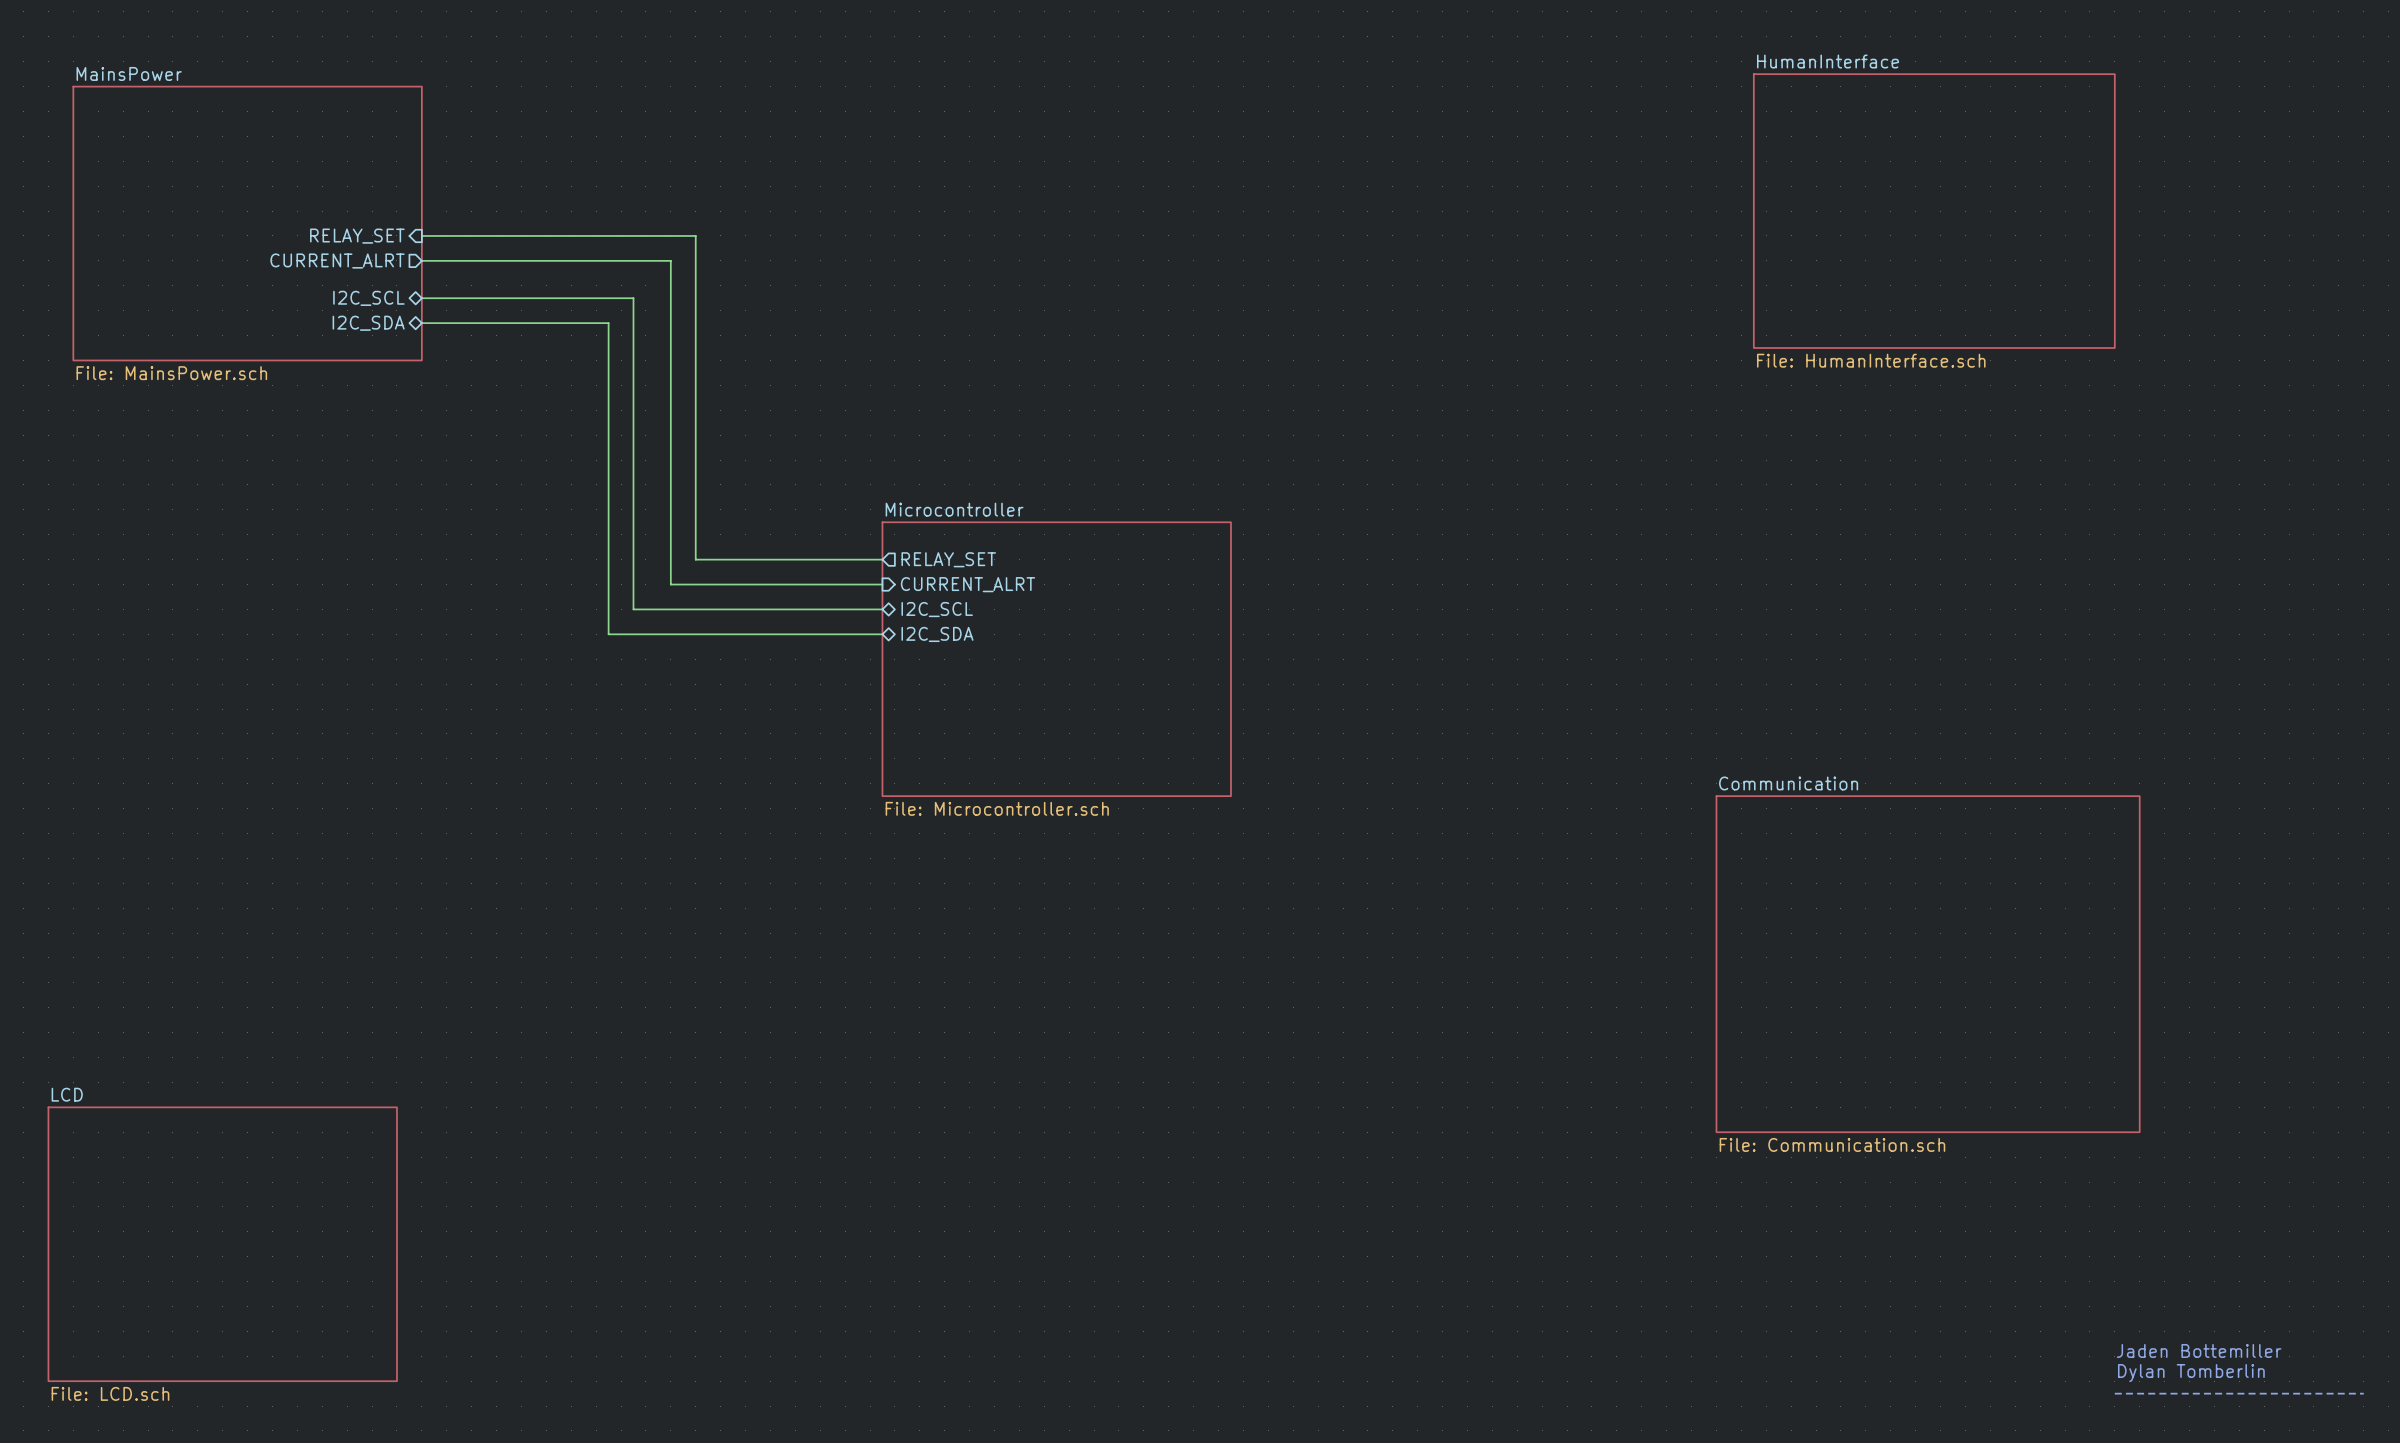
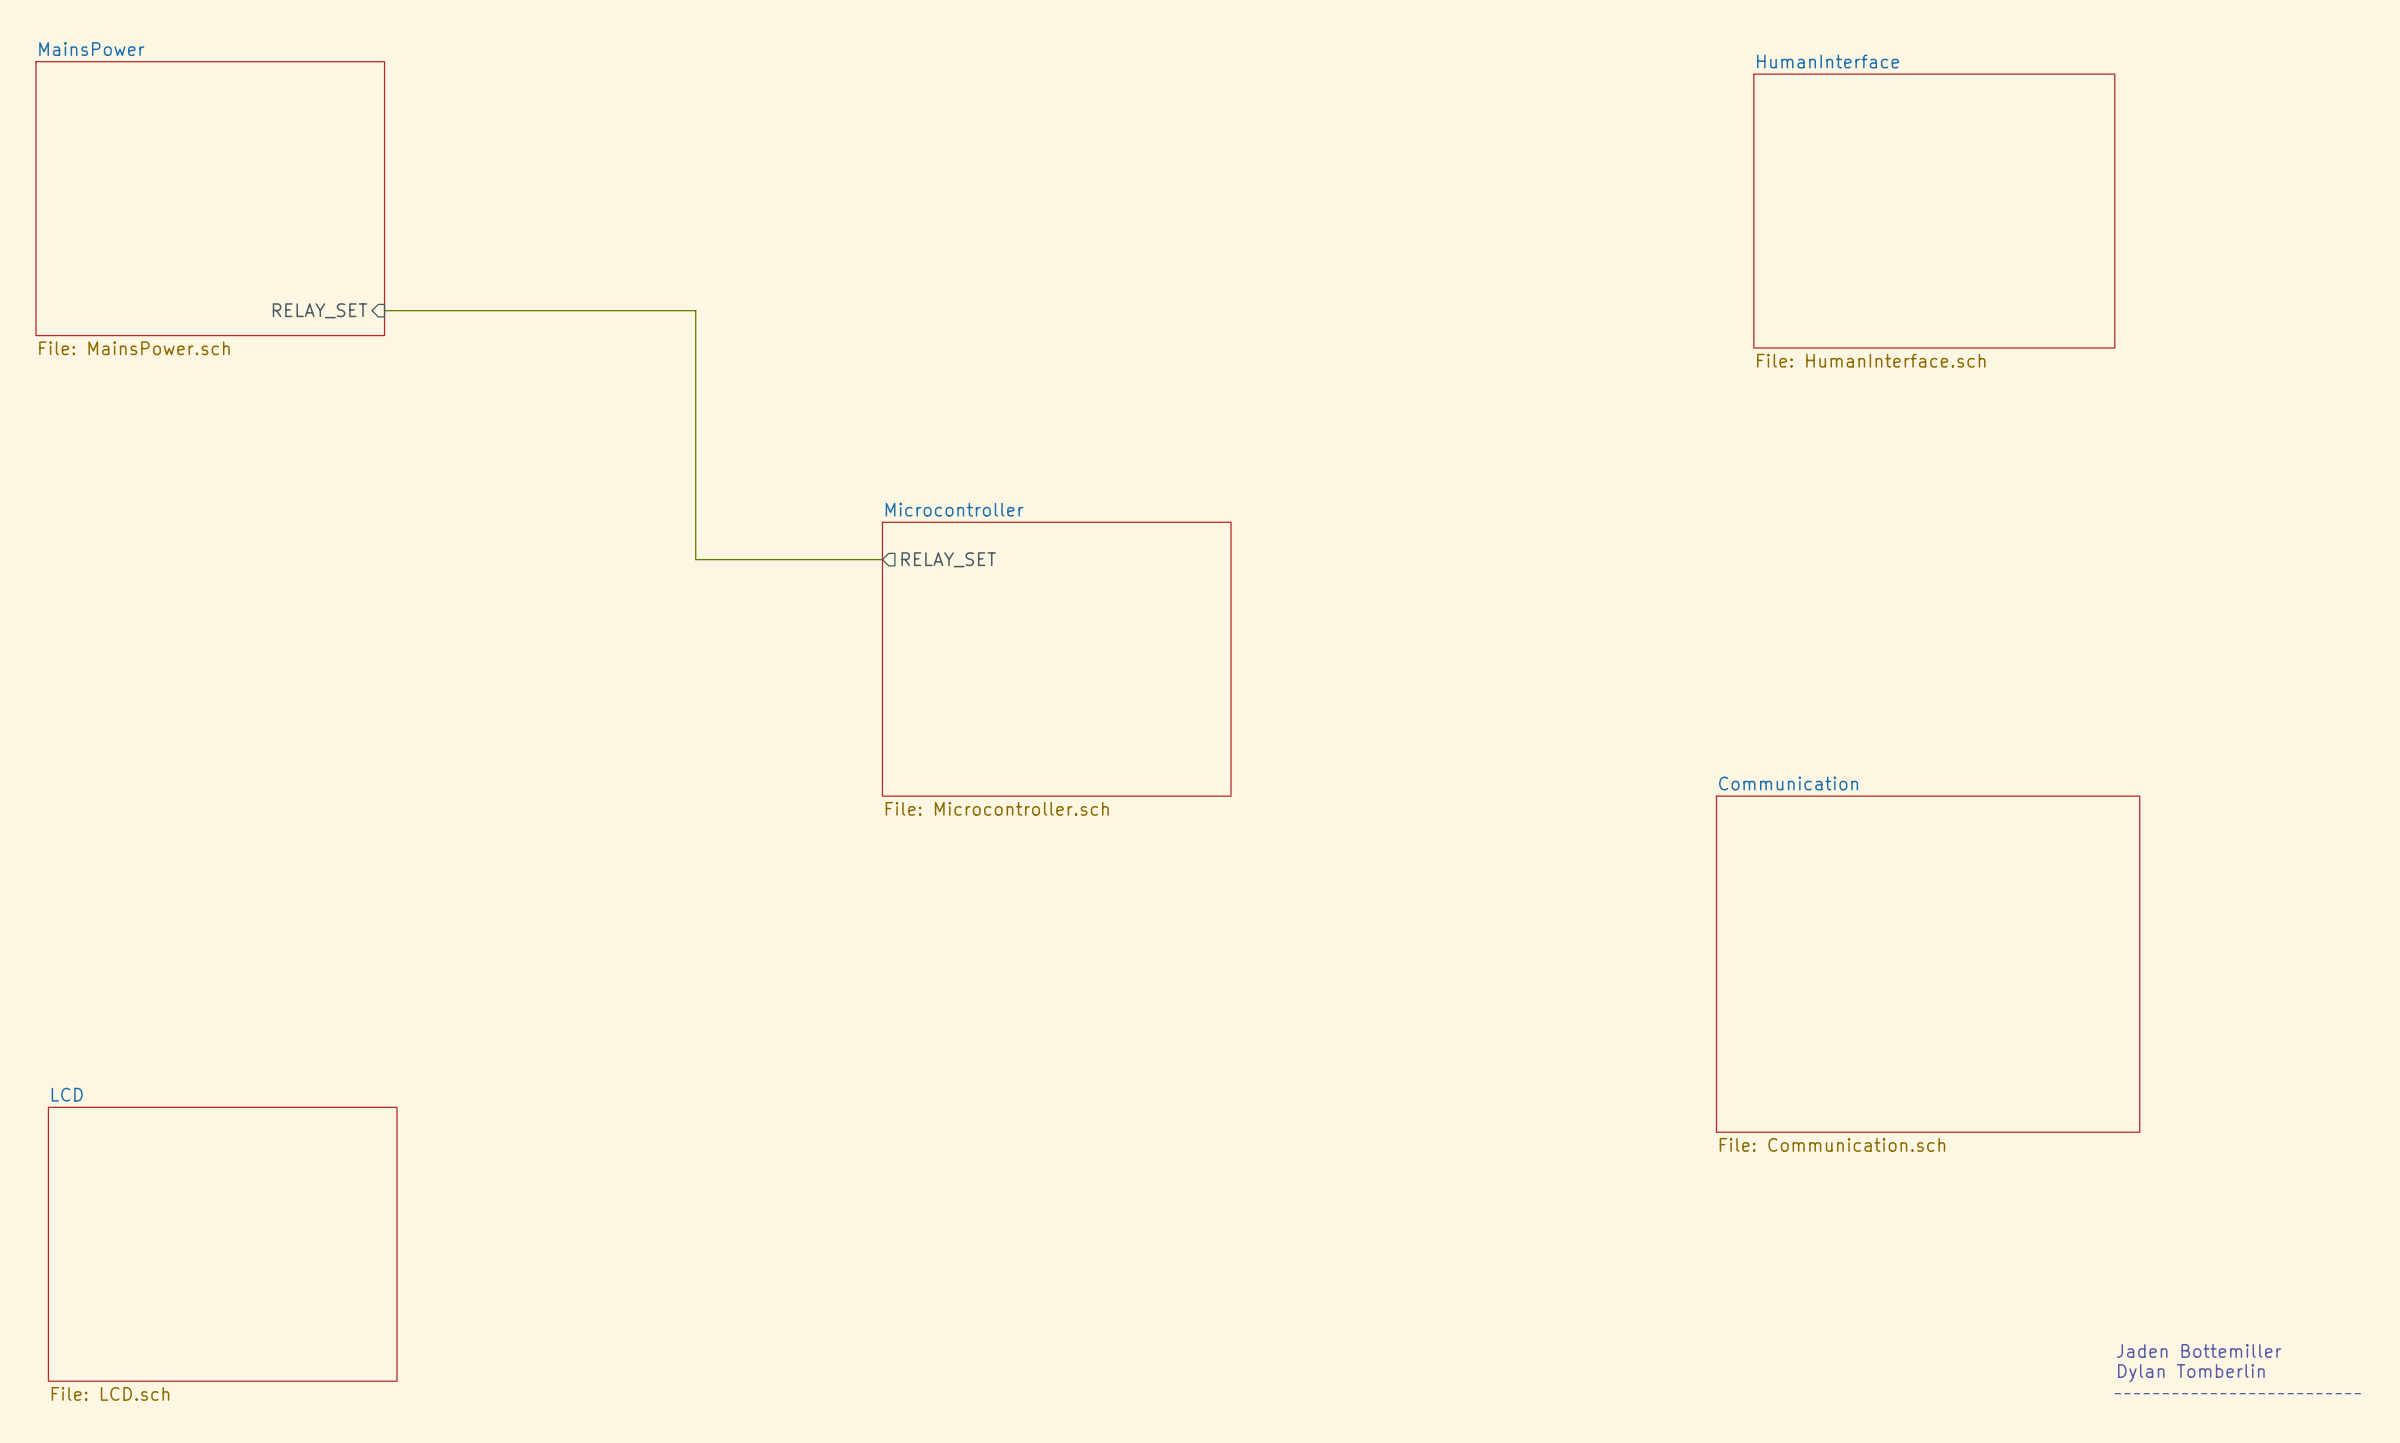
sheet MainsPower position: (247, 223) -> (210, 198)
wire: (421, 235) (695, 235) (695, 310) -> (384, 310) (695, 310)
sheet pin position: RELAY_SET (357, 236) -> RELAY_SET (320, 310)
wire: (421, 260) (670, 260) (670, 584) (882, 584) -> none
sheet pin: CURRENT_ALRT (337, 261) -> none
sheet pin: I2C_SCL (368, 298) -> none
wire: (421, 298) (633, 298) (633, 609) (882, 609) -> none
sheet pin: I2C_SDA (368, 323) -> none
wire: (421, 323) (608, 323) (608, 634) (882, 634) -> none
sheet pin: CURRENT_ALRT (968, 584) -> none
sheet pin: I2C_SCL (937, 609) -> none
sheet pin: I2C_SDA (937, 634) -> none

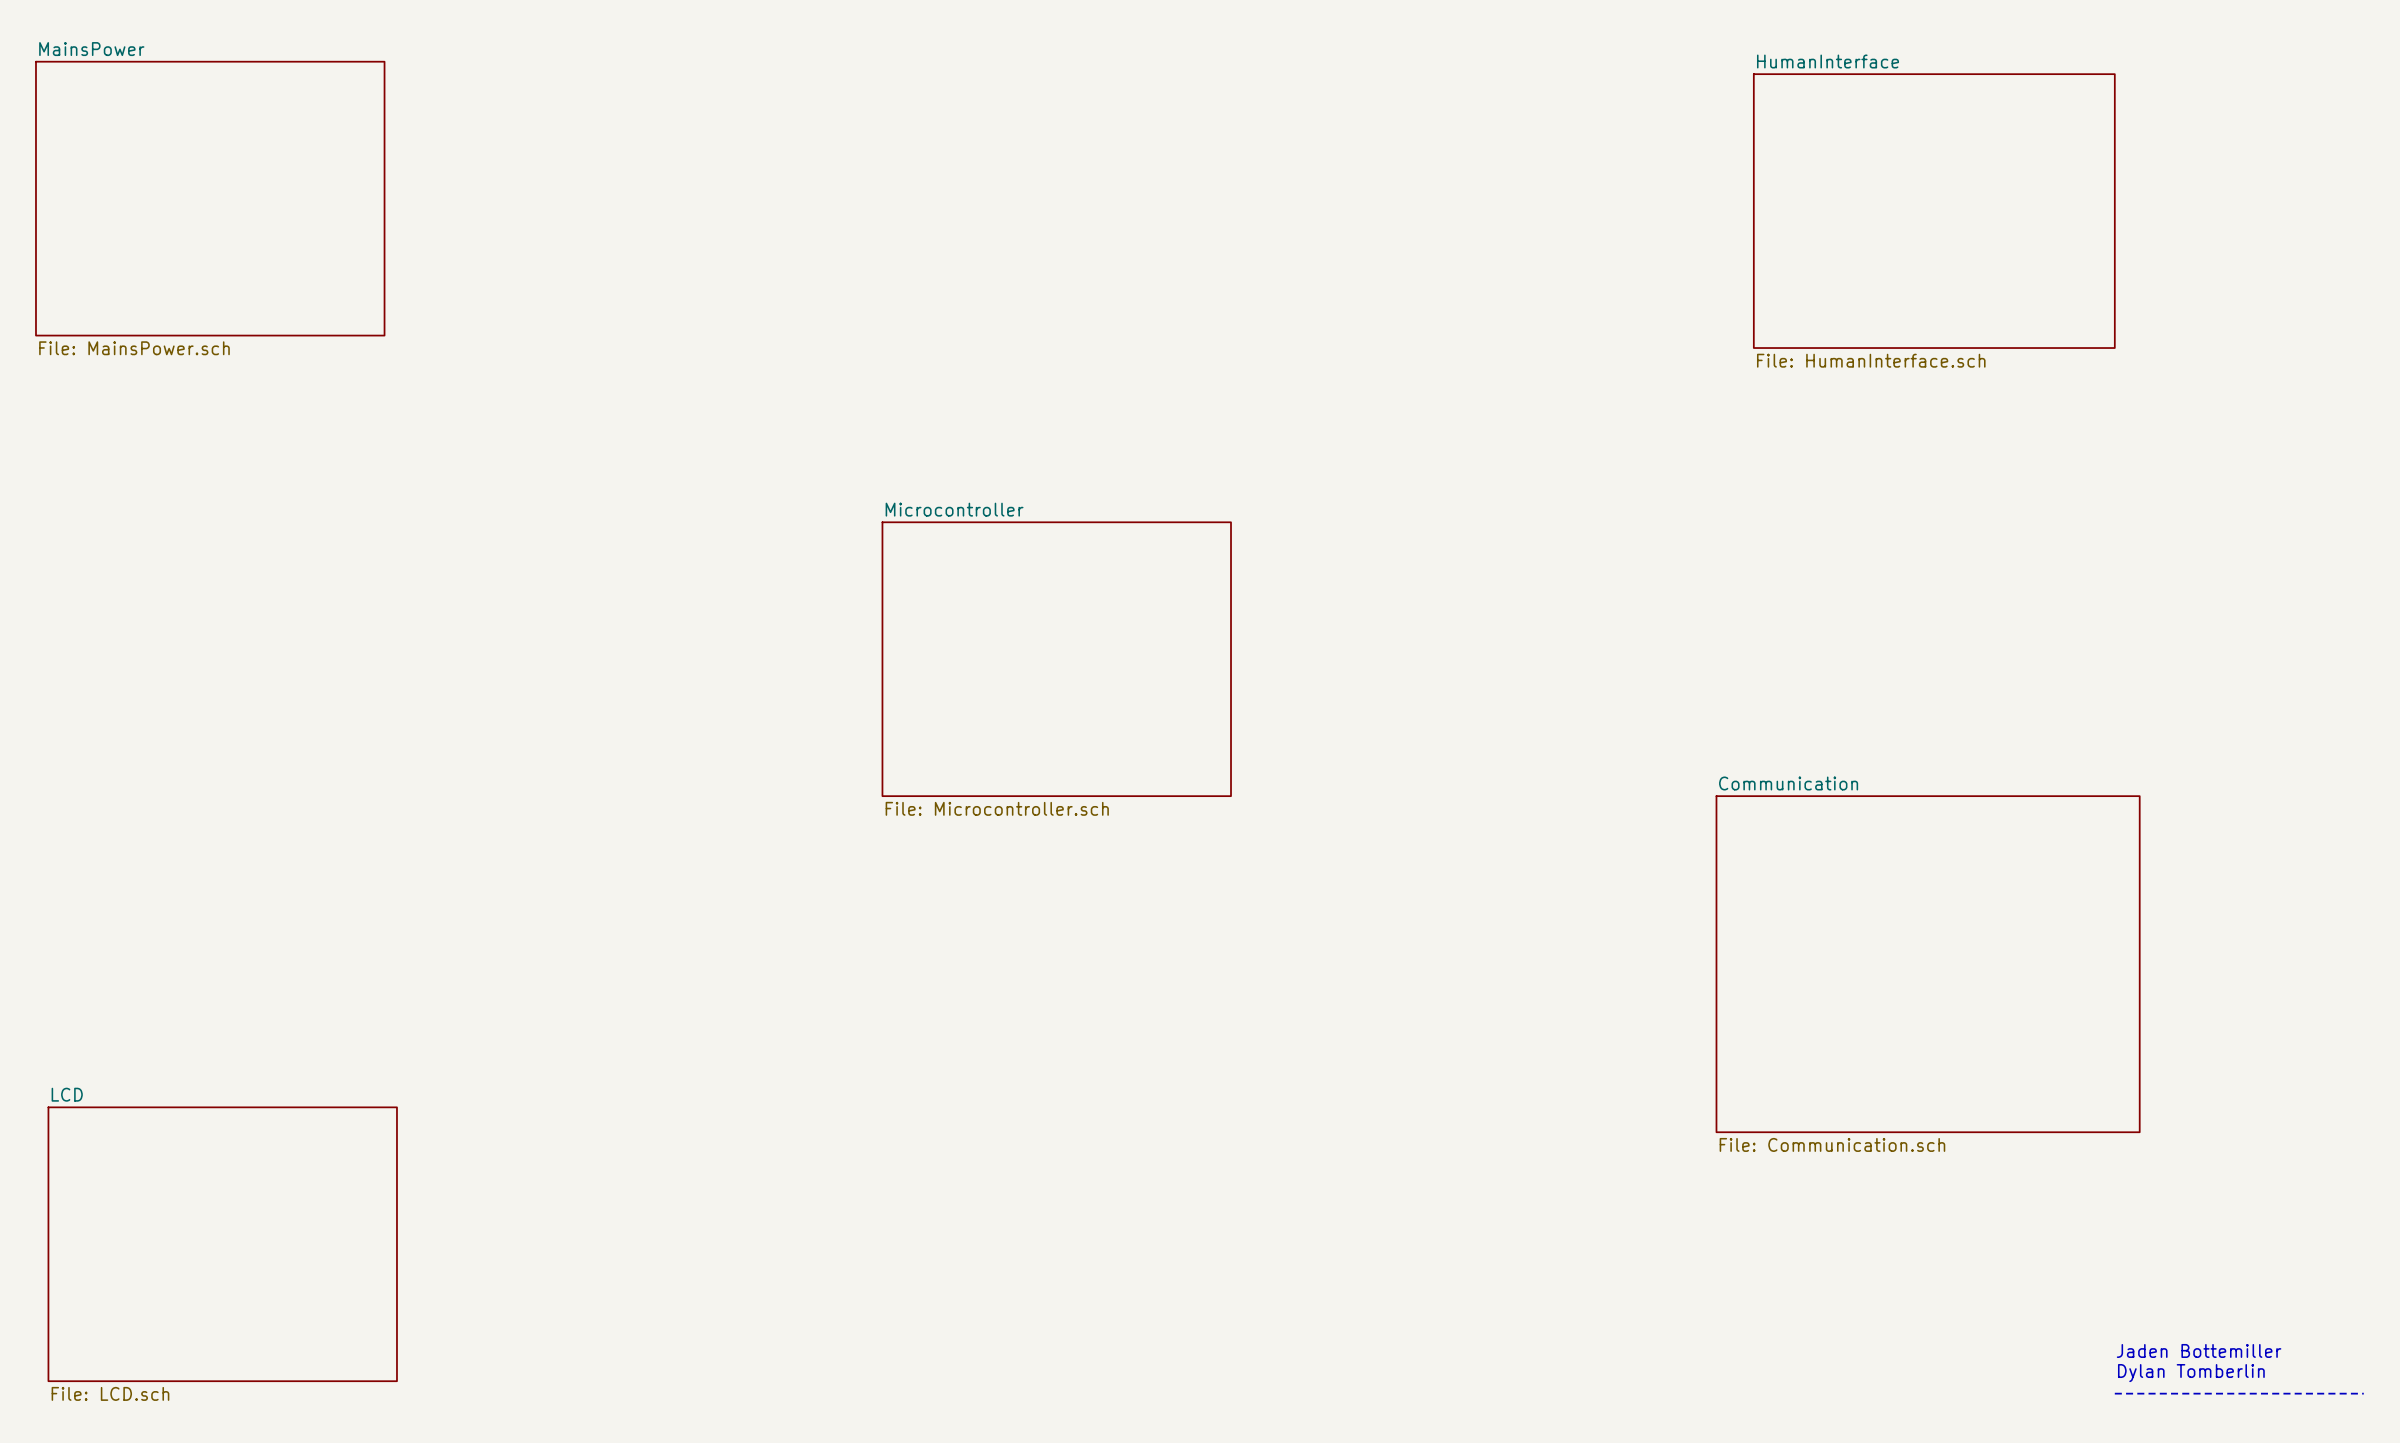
sheet pin: RELAY_SET (320, 310) -> none
wire: (384, 310) (695, 310) (695, 559) (882, 559) -> none
sheet pin: RELAY_SET (948, 559) -> none

